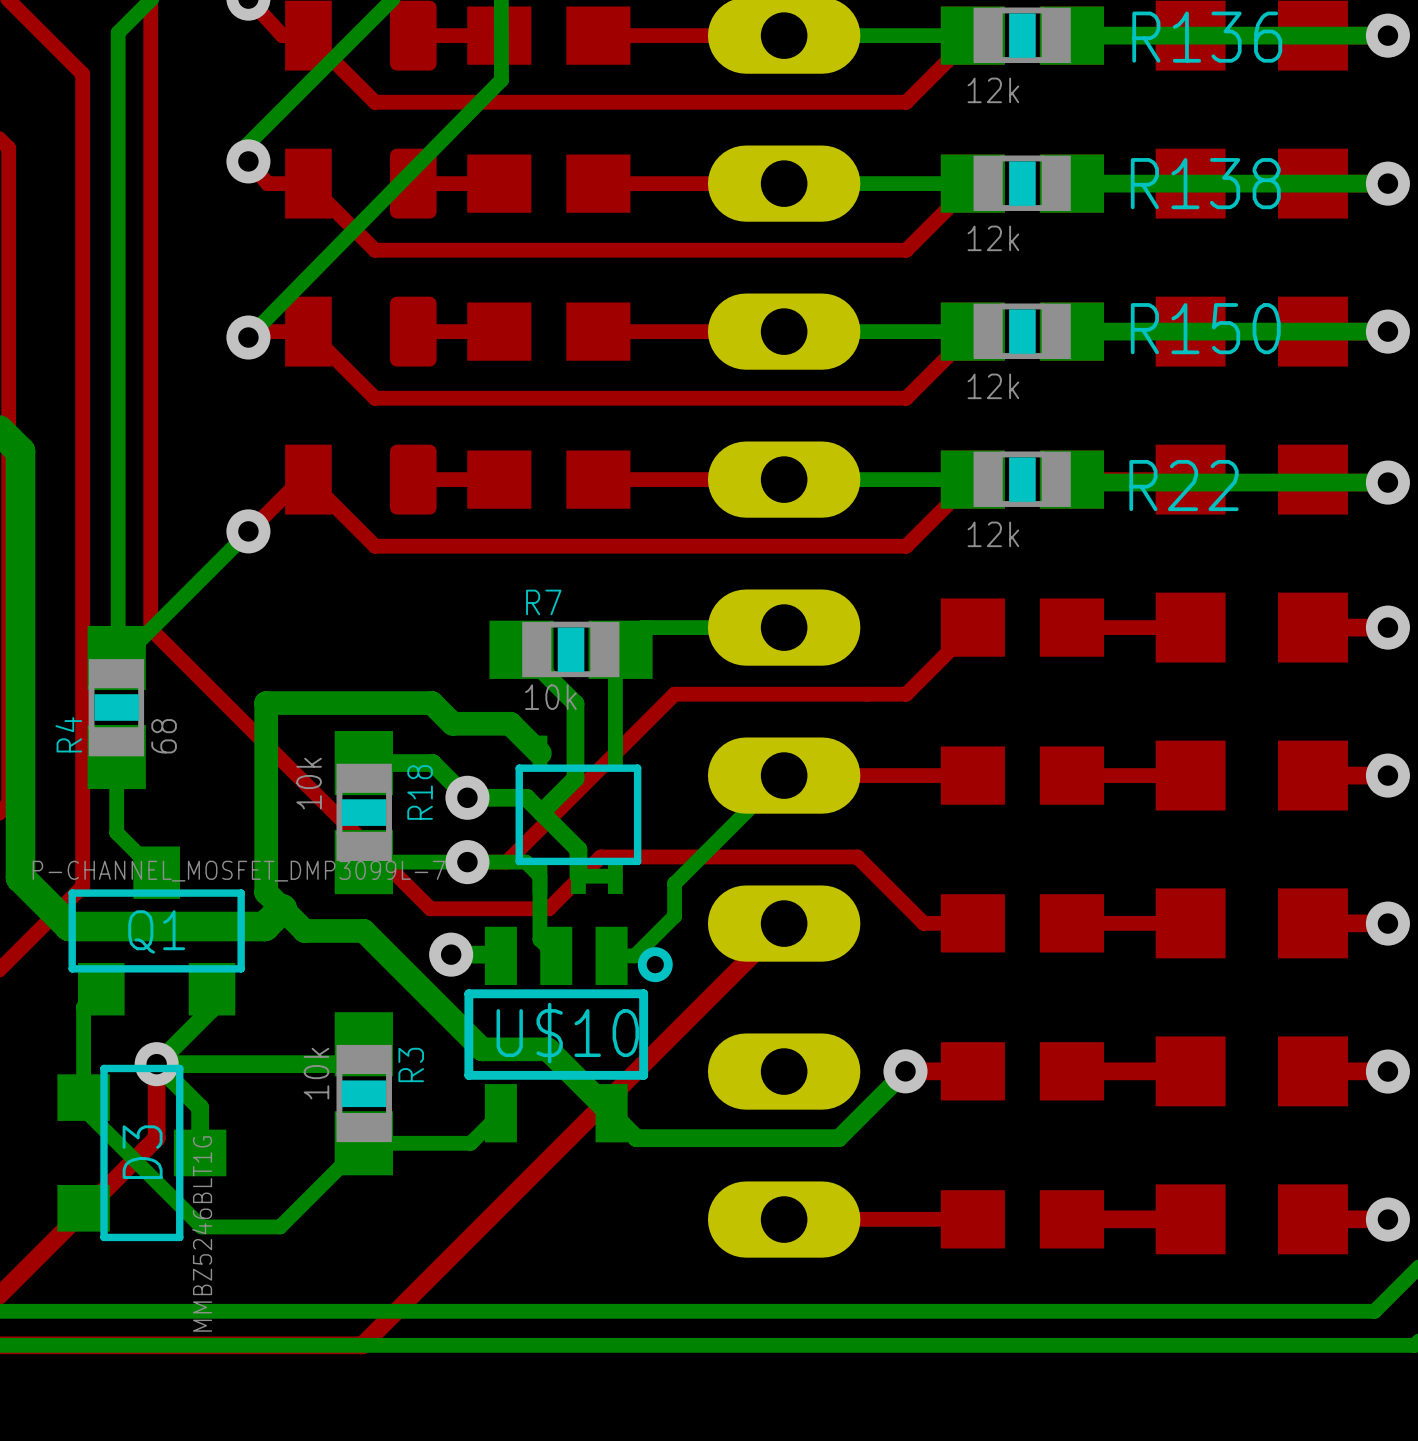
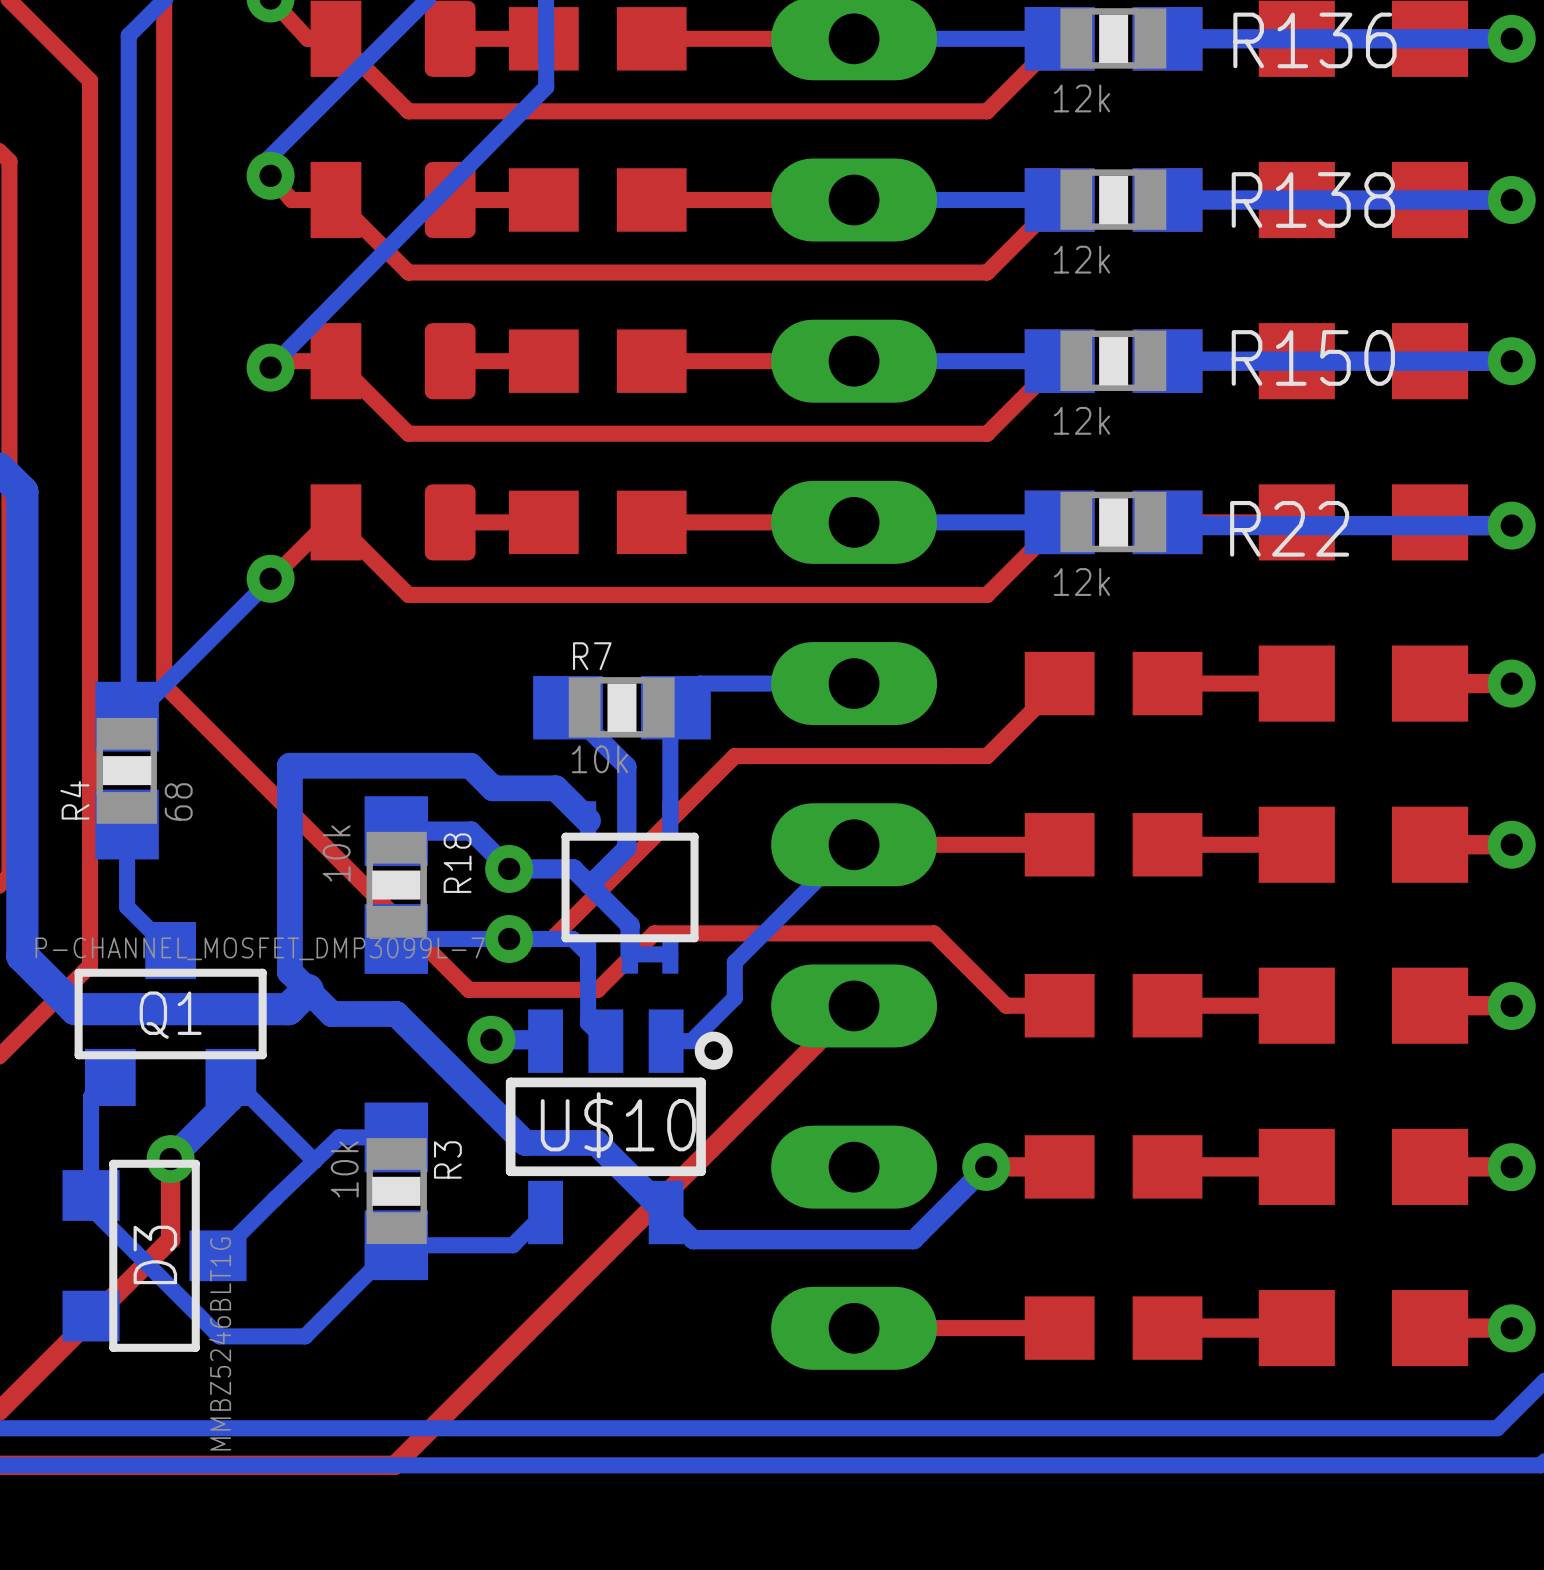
bottom track: none -> (230, 1077) (314, 1161)
bottom track width: thin (212, 989) (212, 1008) (156, 1064) -> thick (230, 1077) (230, 1098) (170, 1159)
bottom track: (363, 1044) (343, 1064) (156, 1064) (200, 1107) (200, 1152) -> (396, 1137) (339, 1137) (217, 1255)

